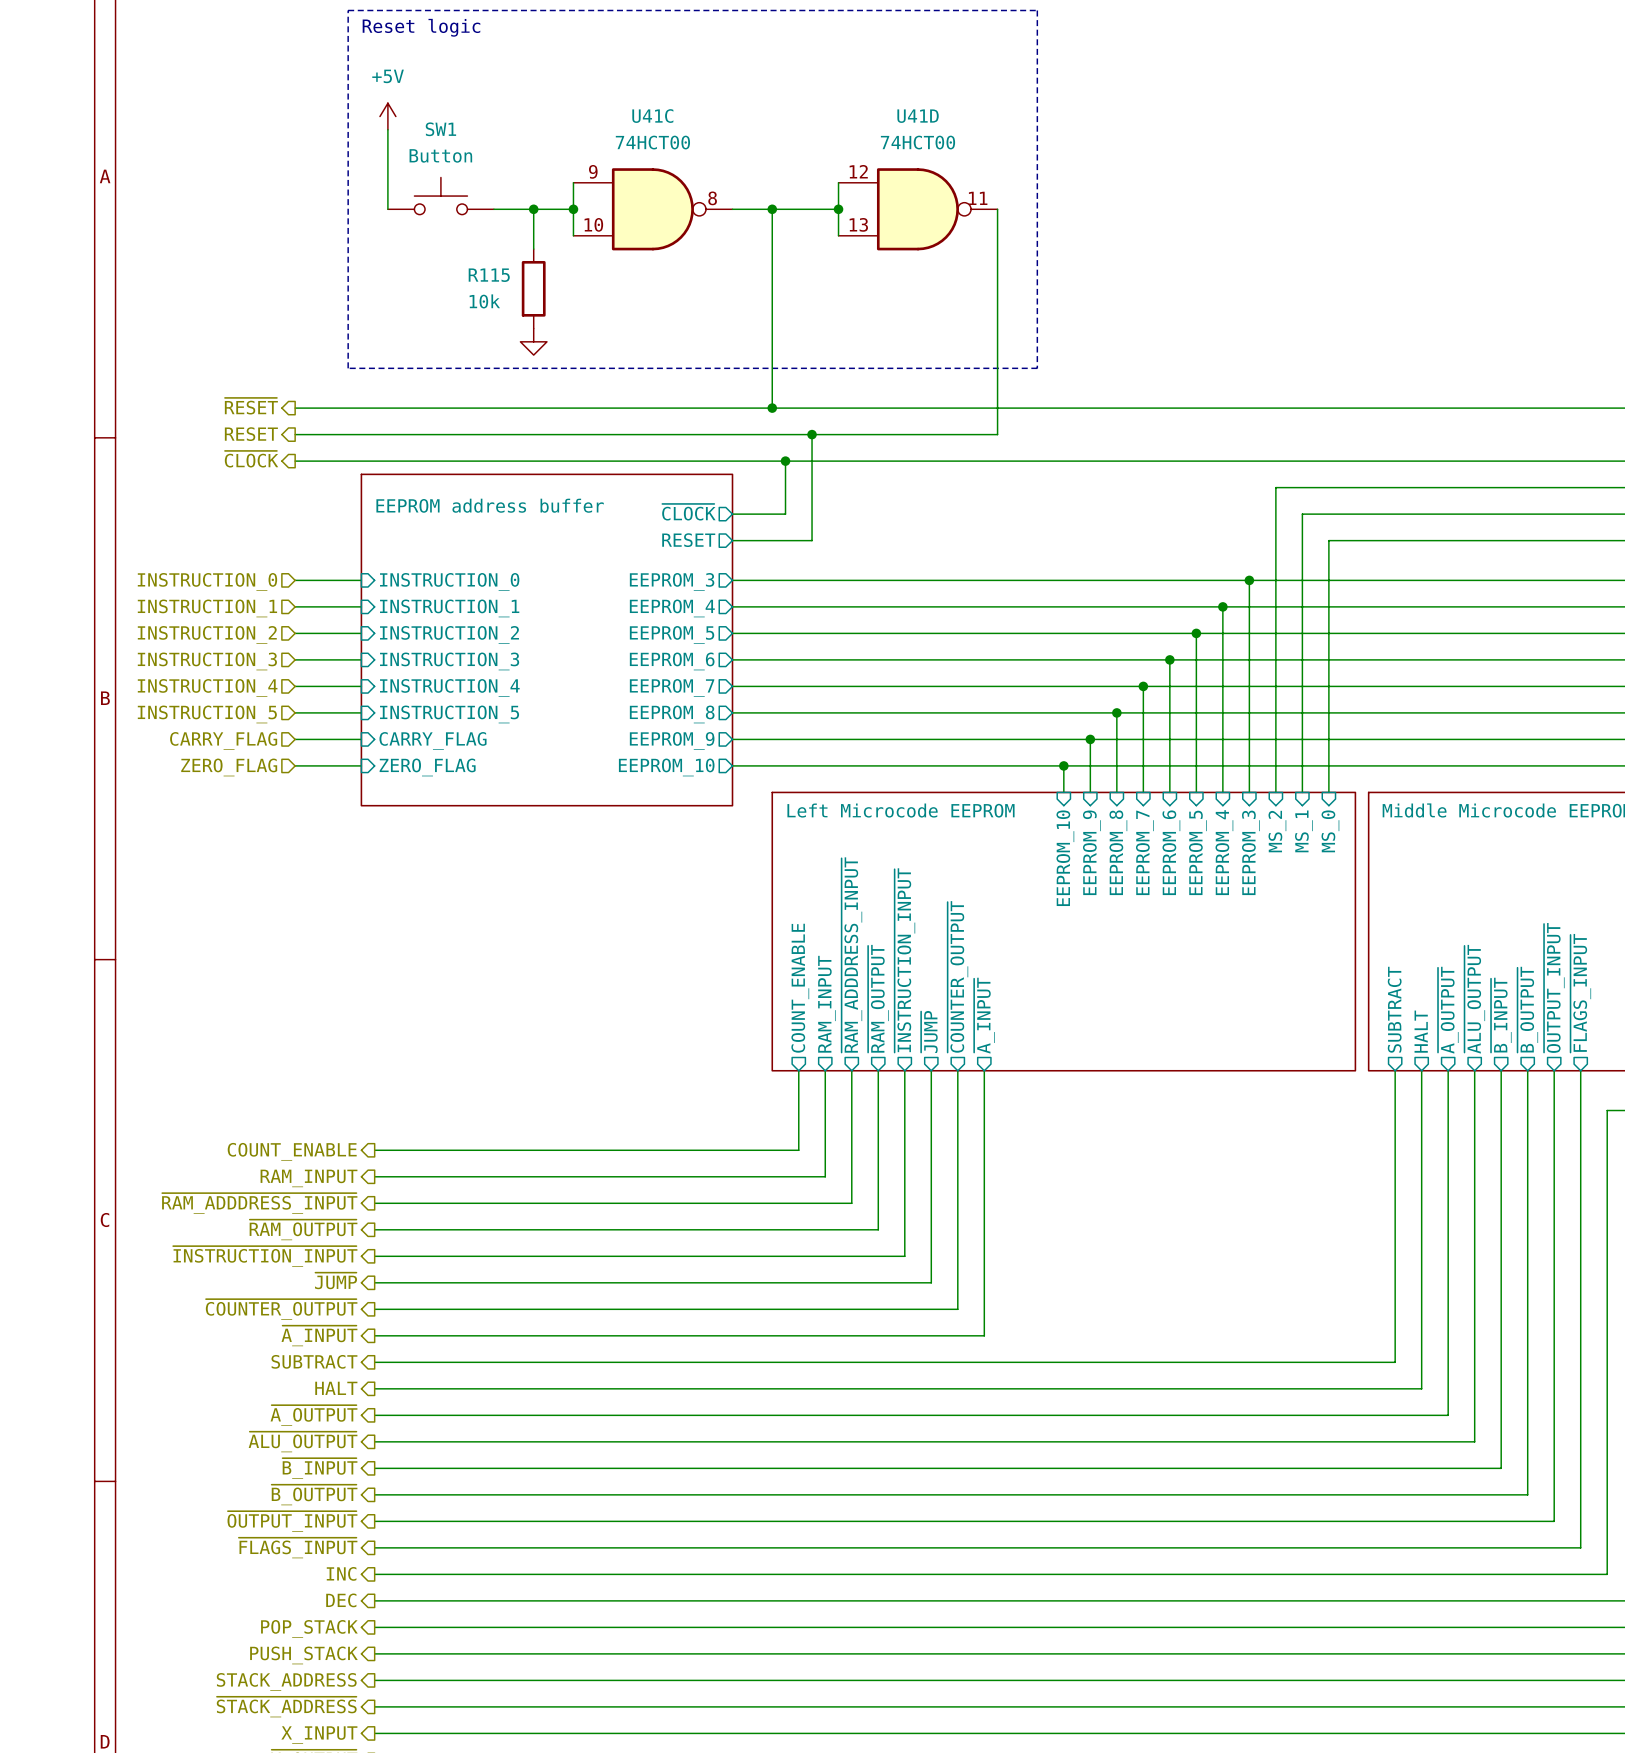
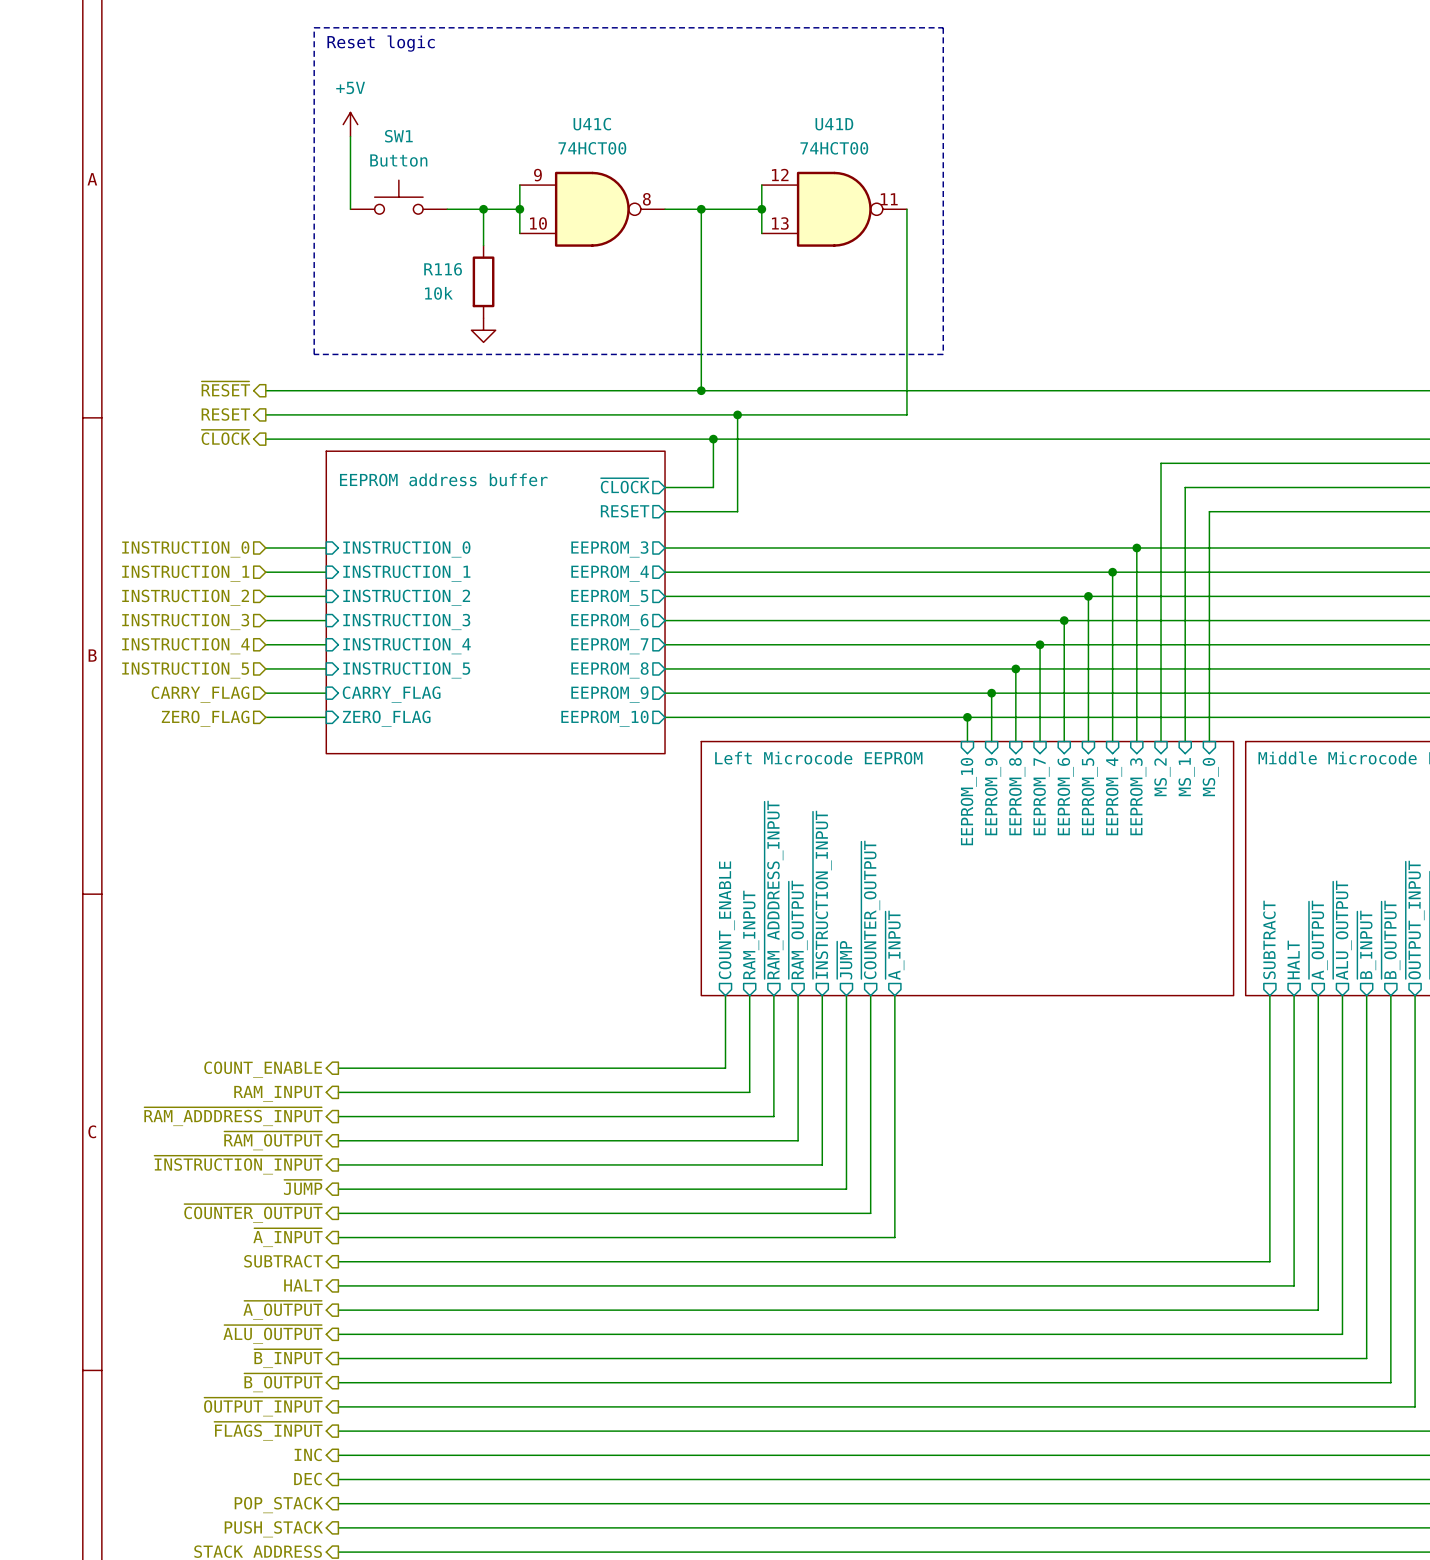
R115 name: R115 (489, 275) -> R116 (443, 269)

